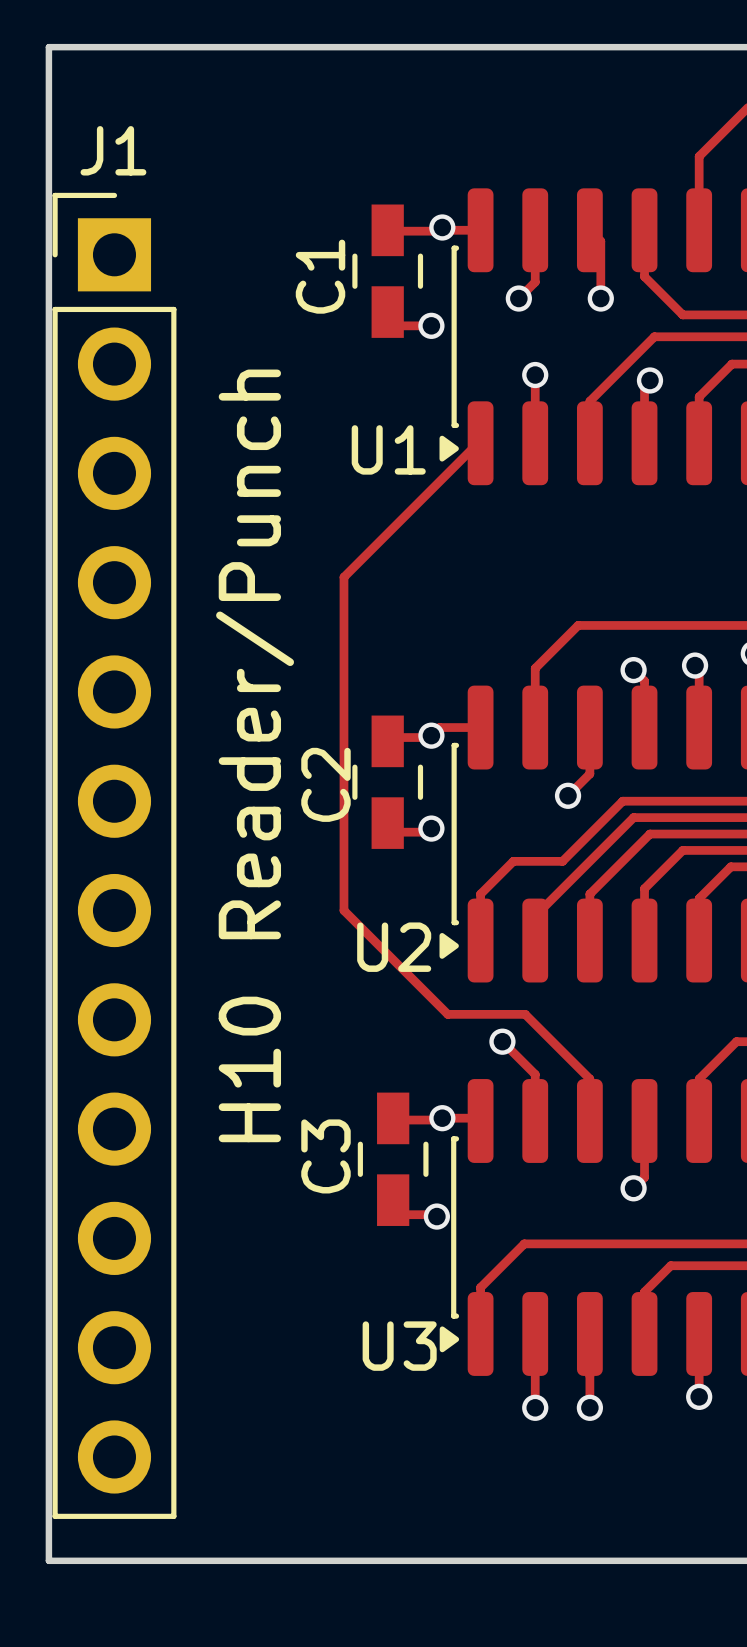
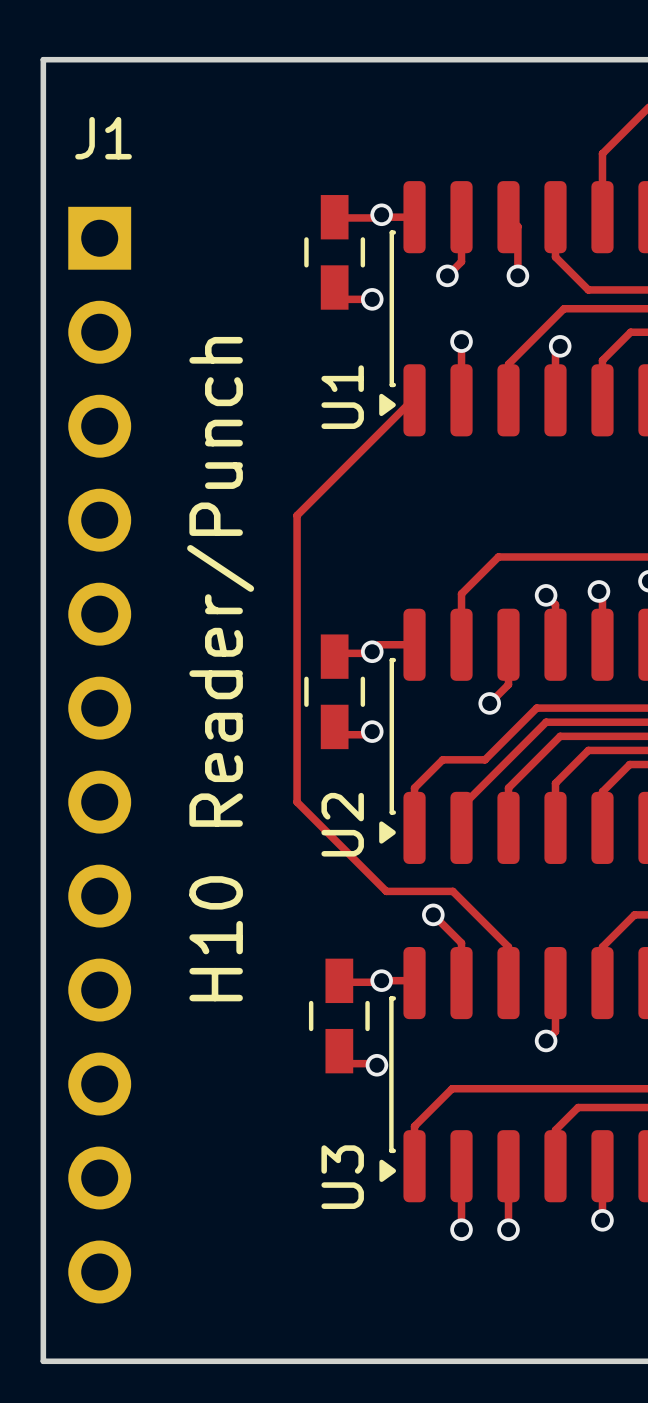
C1 name: C1 (320, 276) -> none
U1 name rotation: 0° (388, 449) -> 90° counterclockwise (342, 397)
C2 name: C2 (325, 784) -> none
J1 side: top (114, 855) -> bottom (99, 755)
U2 name rotation: 0° (394, 947) -> 90° counterclockwise (342, 824)
C3 name: C3 (325, 1156) -> none
U3 name rotation: 0° (399, 1346) -> 90° counterclockwise (342, 1177)

